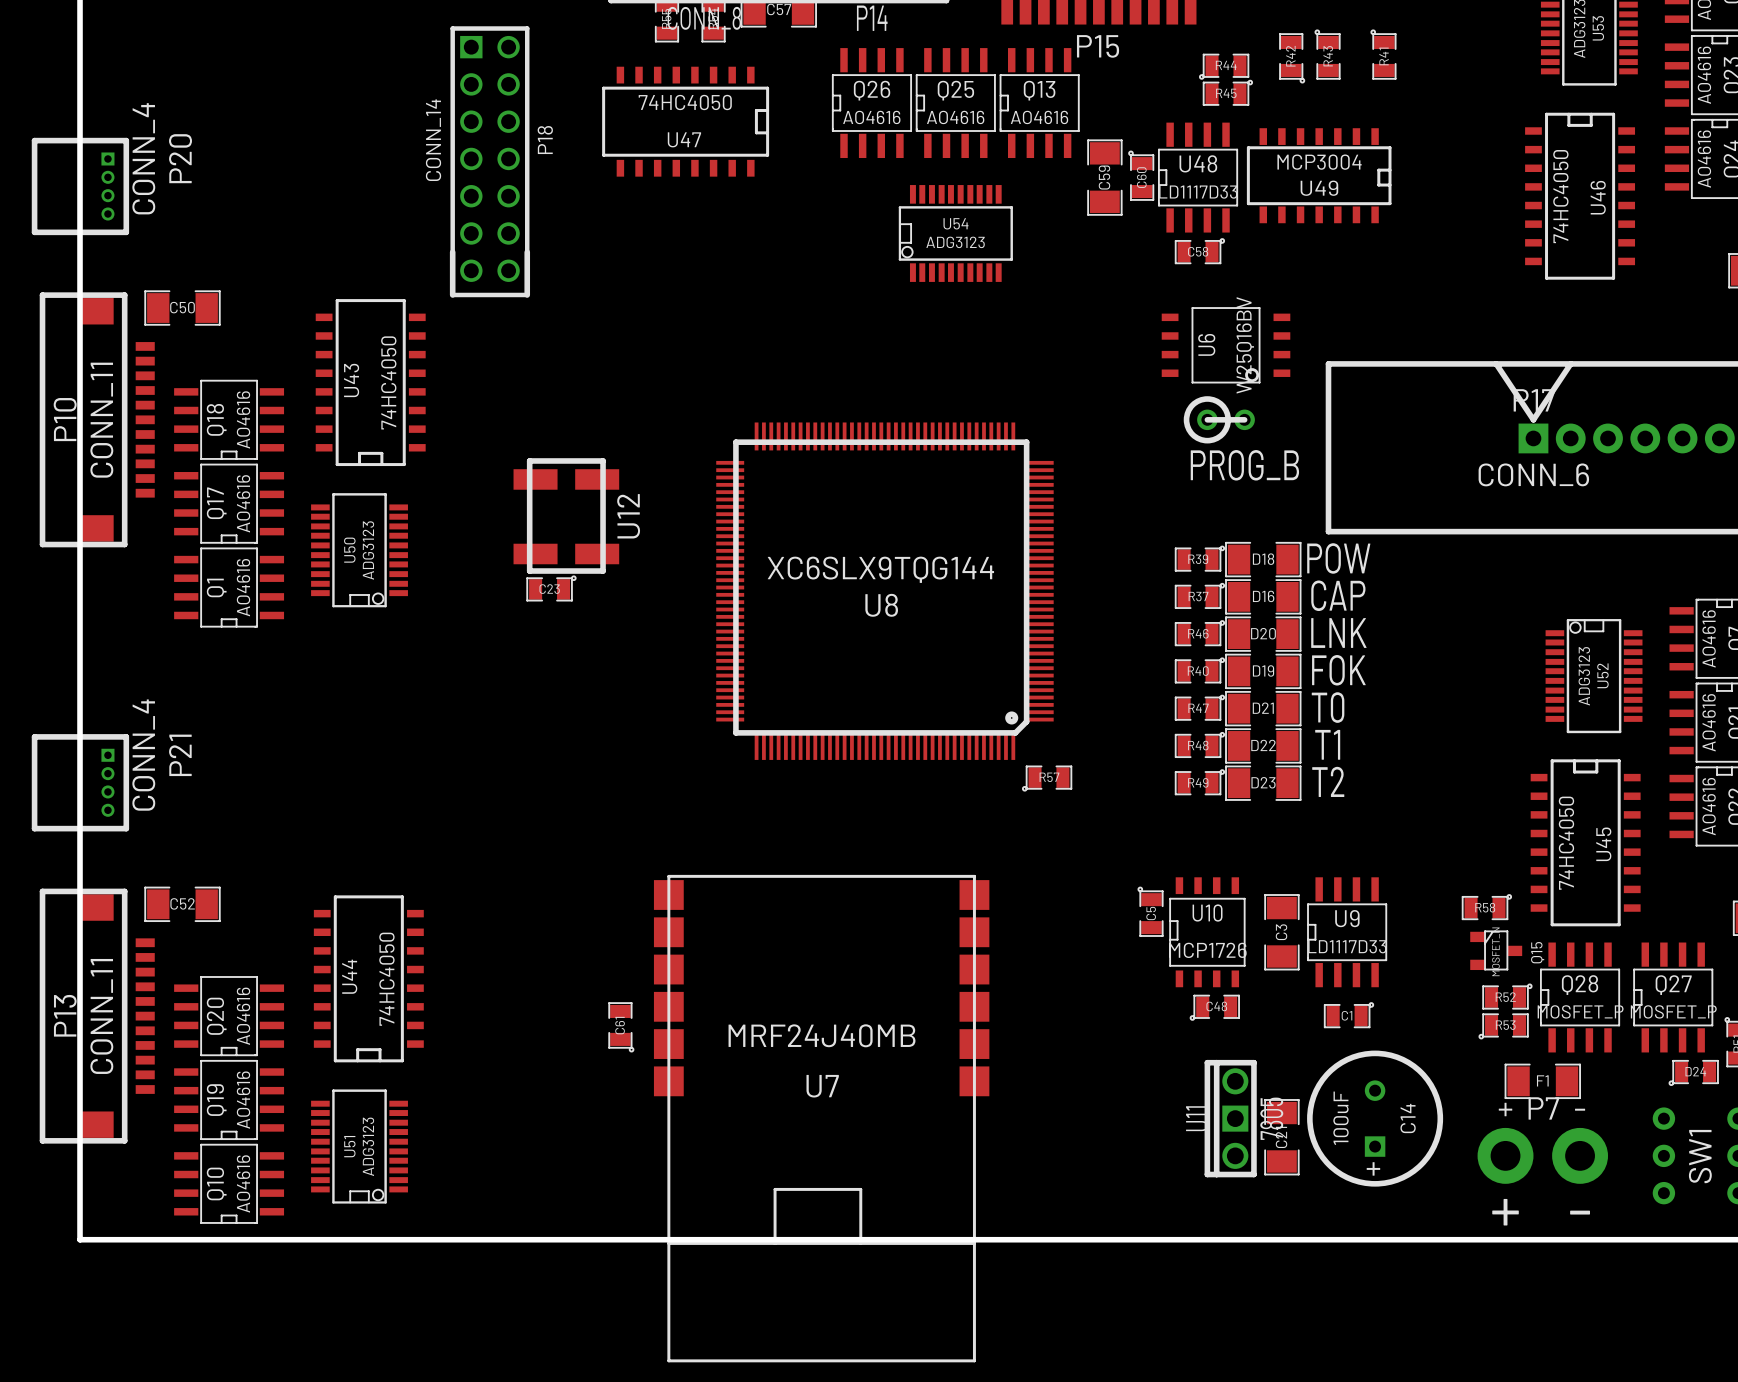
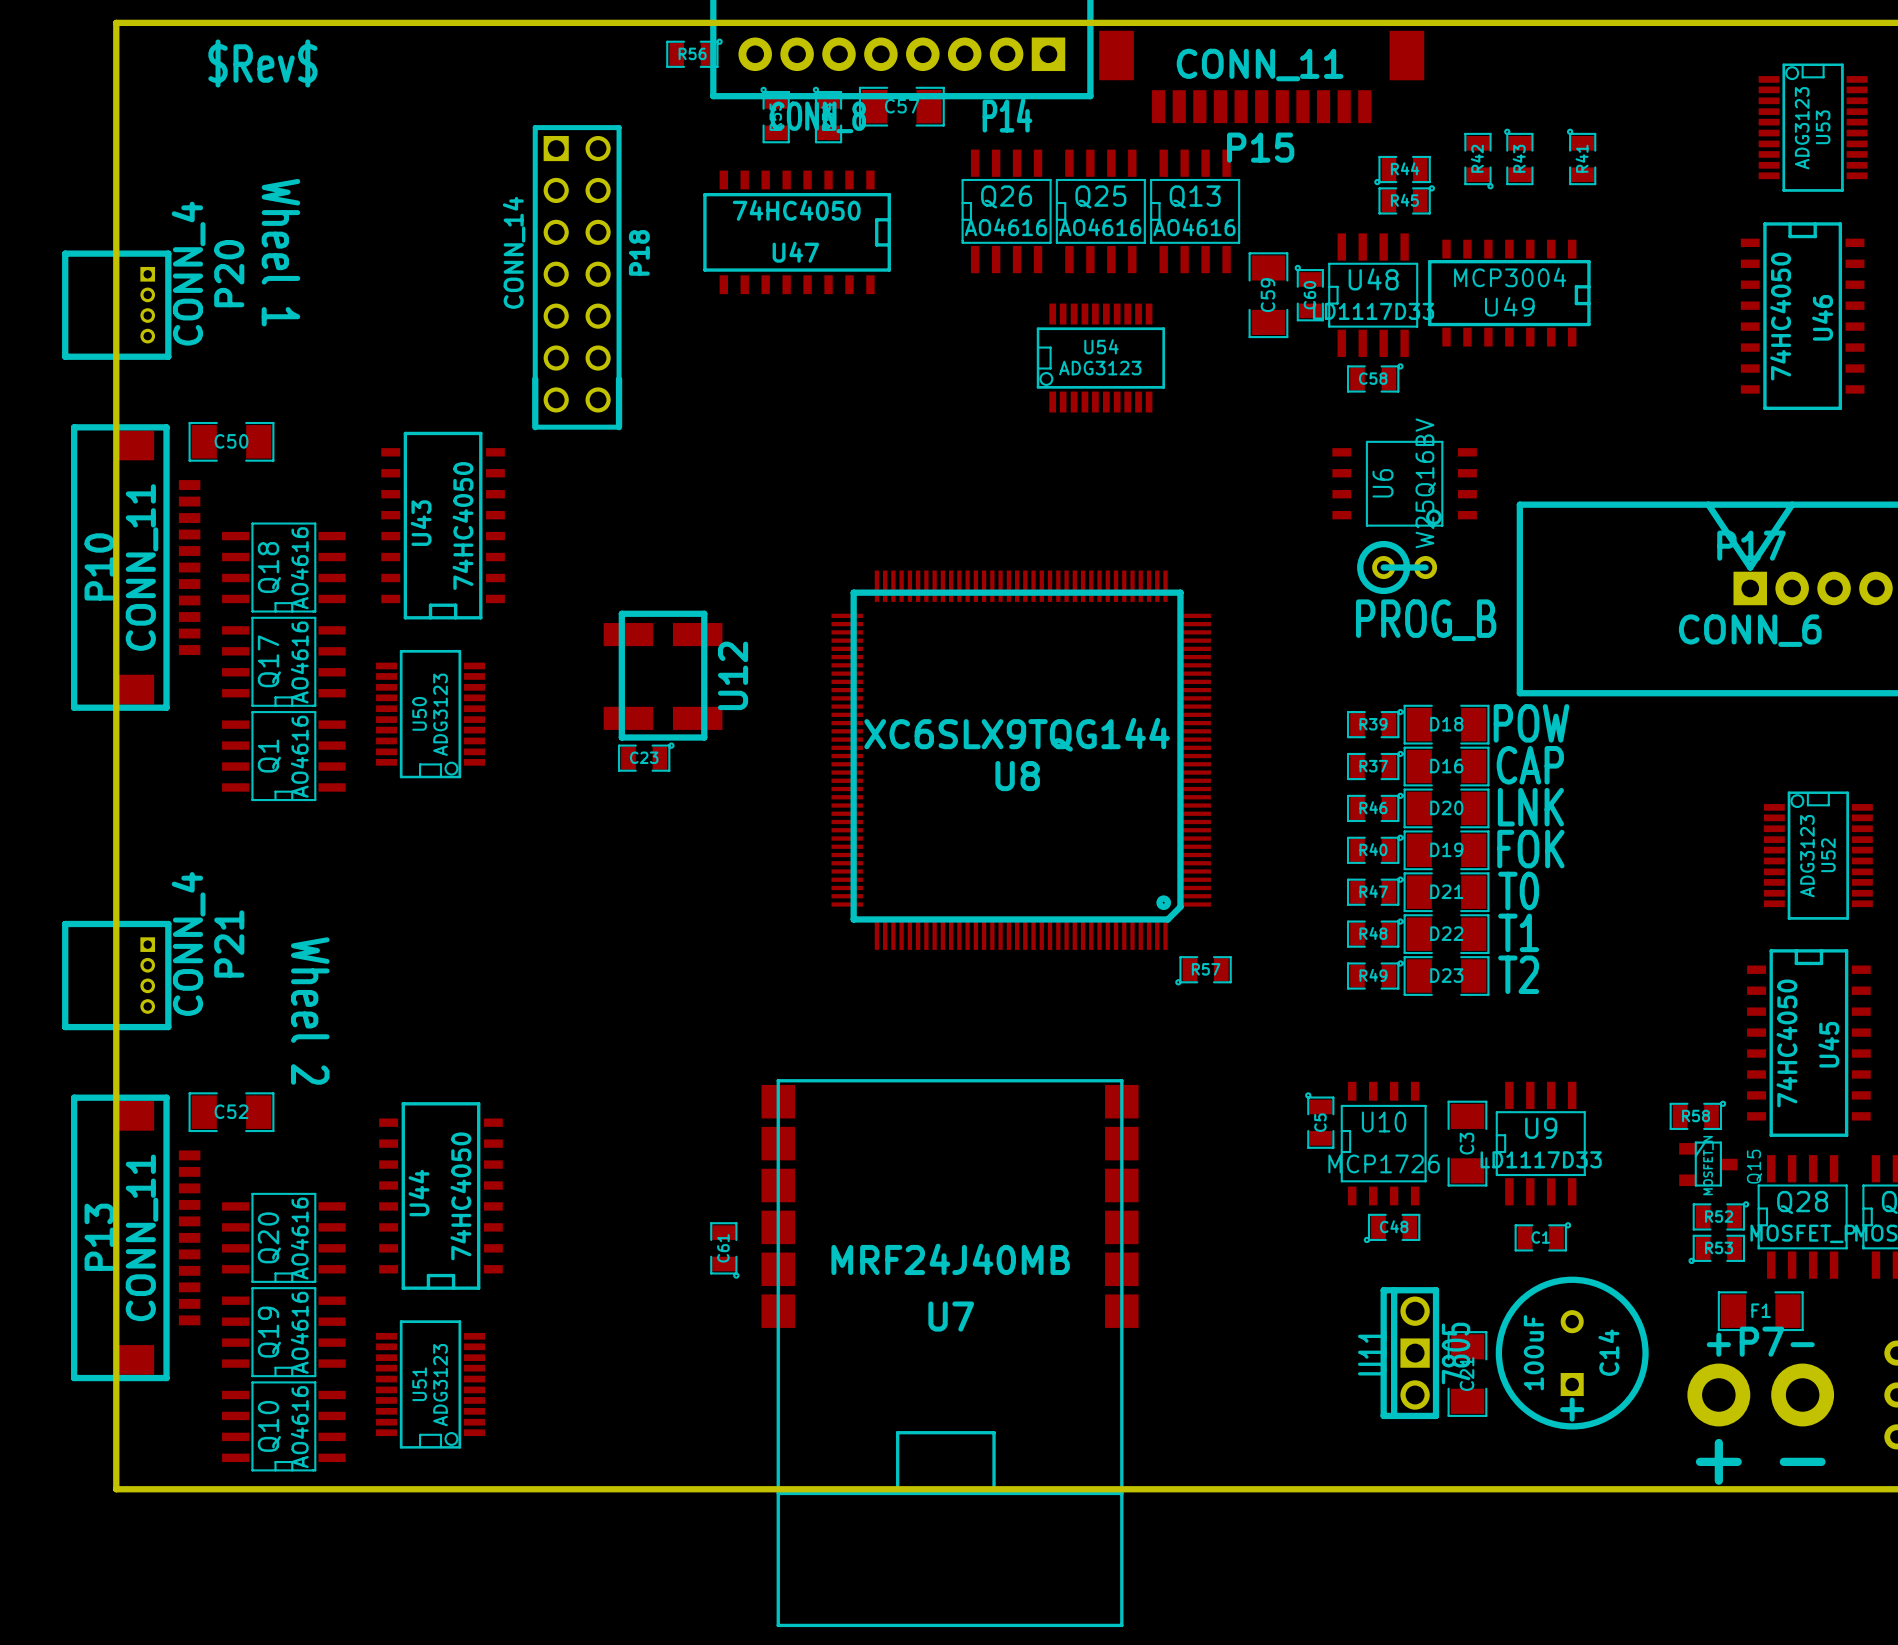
text: none -> Wheel 1 (280, 252)
text: none -> Wheel 2 (310, 1011)

